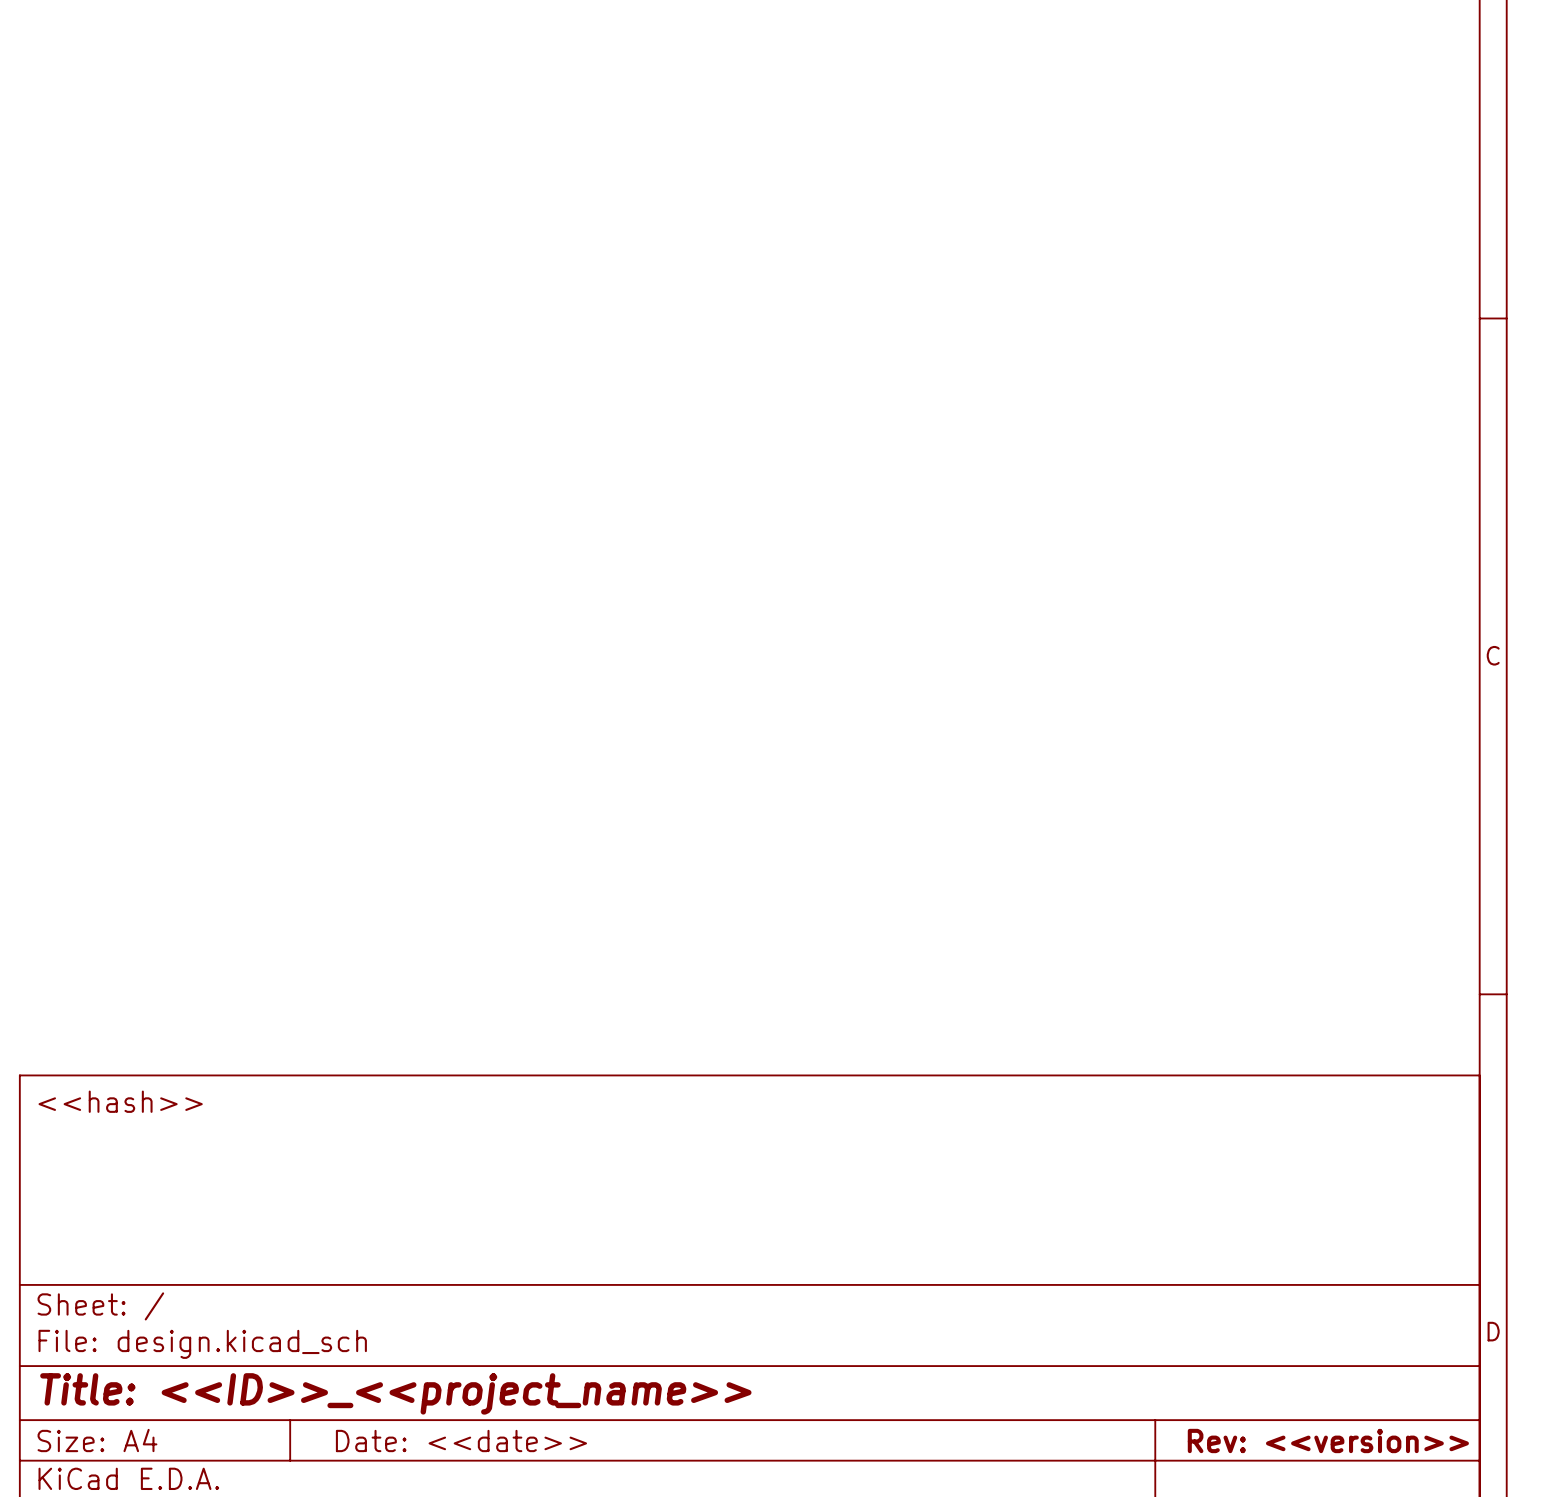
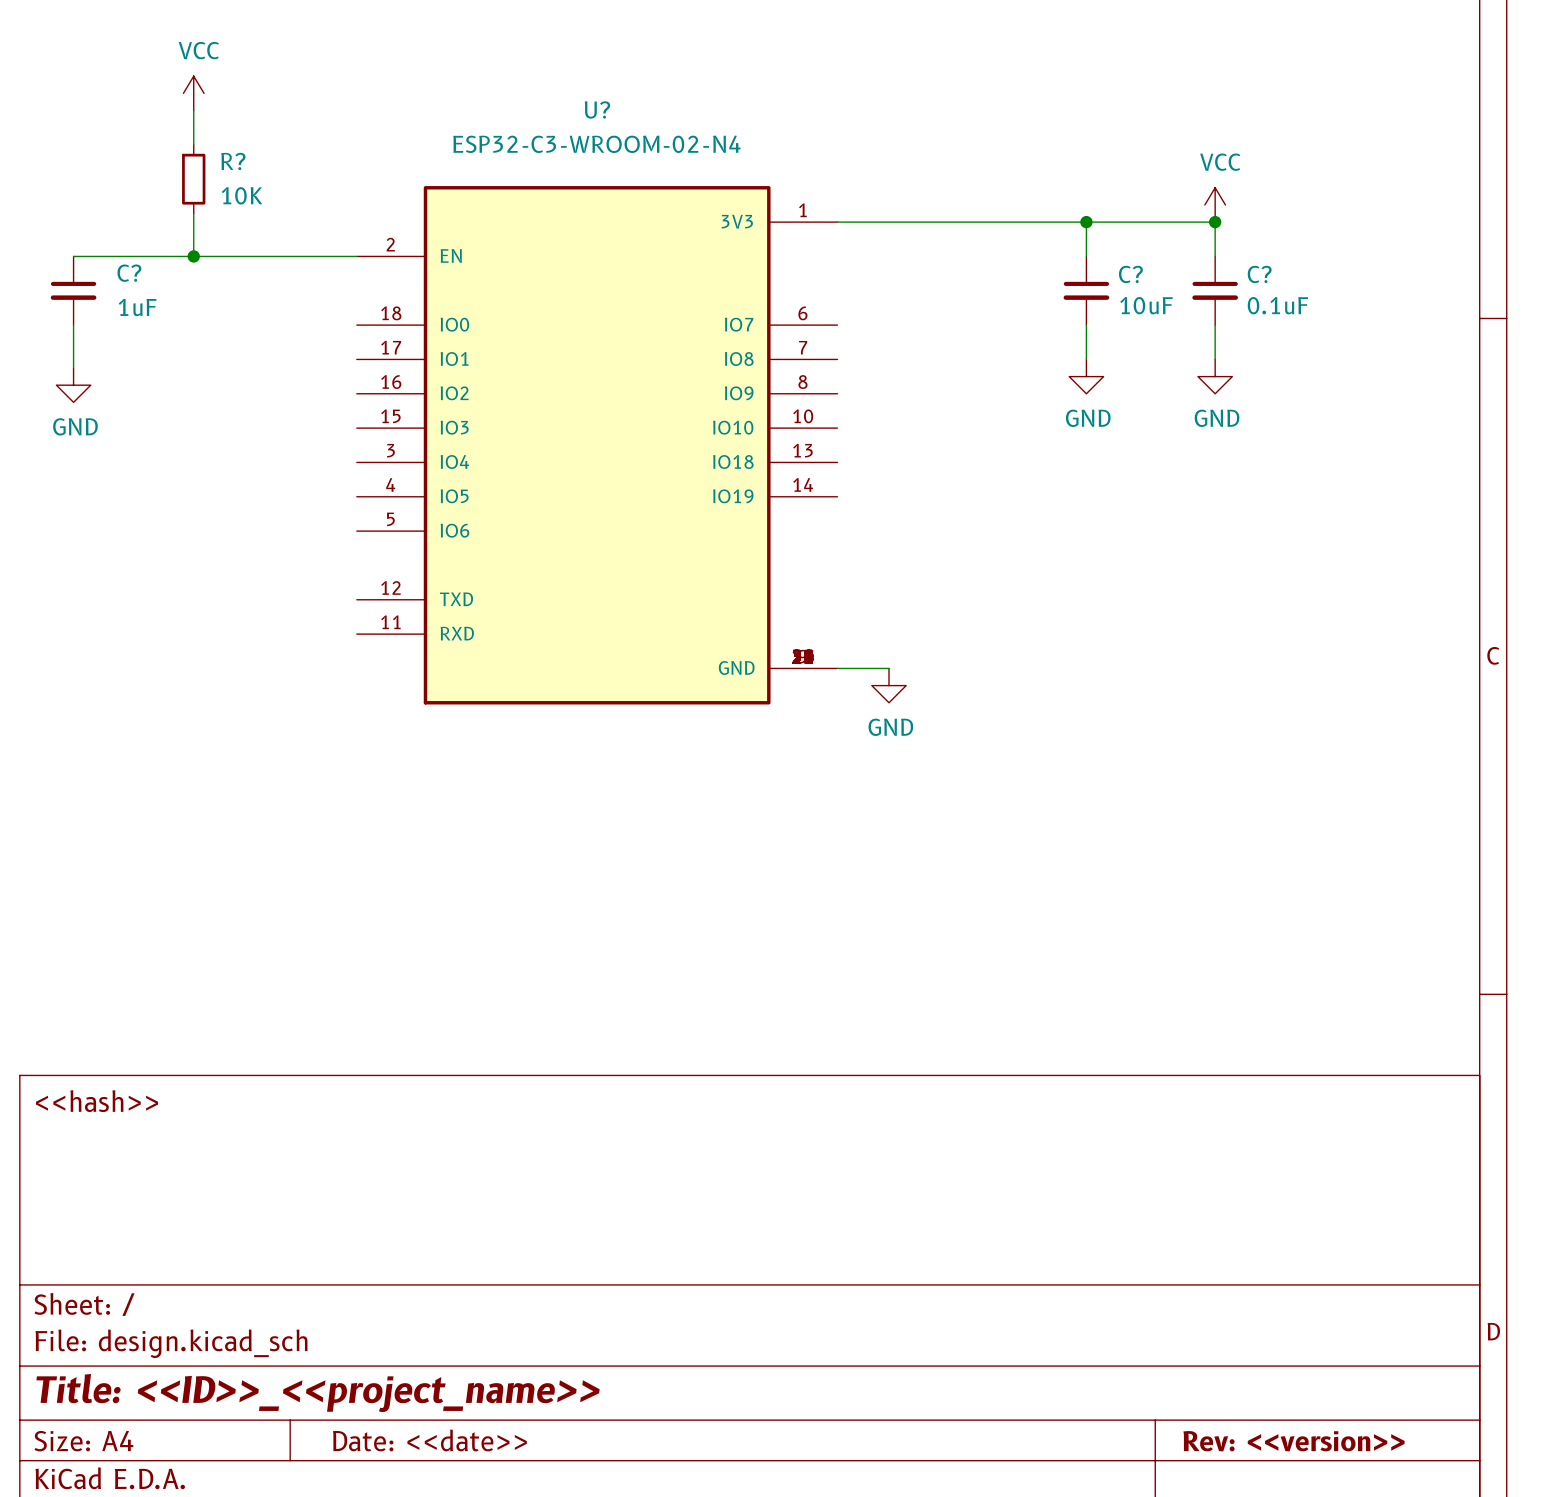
power symbol: none -> VCC (193, 93)
wire: none -> (193, 110) (193, 144)
R?: none -> 10K (193, 179)
power symbol: none -> VCC (1215, 204)
wire: none -> (193, 213) (193, 256)
wire: none -> (837, 222) (1215, 222) (1215, 256)
wire: none -> (1086, 222) (1086, 256)
junction: none -> (1086, 222)
junction: none -> (1215, 222)
wire: none -> (73, 256) (356, 256)
junction: none -> (193, 256)
C?: none -> 1uF (73, 290)
C?: none -> 10uF (1086, 290)
C?: none -> 0.1uF (1215, 290)
wire: none -> (73, 325) (73, 368)
wire: none -> (1086, 325) (1086, 359)
wire: none -> (1215, 325) (1215, 359)
power symbol: none -> GND (1086, 376)
power symbol: none -> GND (1215, 376)
power symbol: none -> GND (73, 385)
U?: none -> ESP32-C3-WROOM-02-N4 (597, 445)
wire: none -> (837, 668) (888, 668)
power symbol: none -> GND (888, 685)

